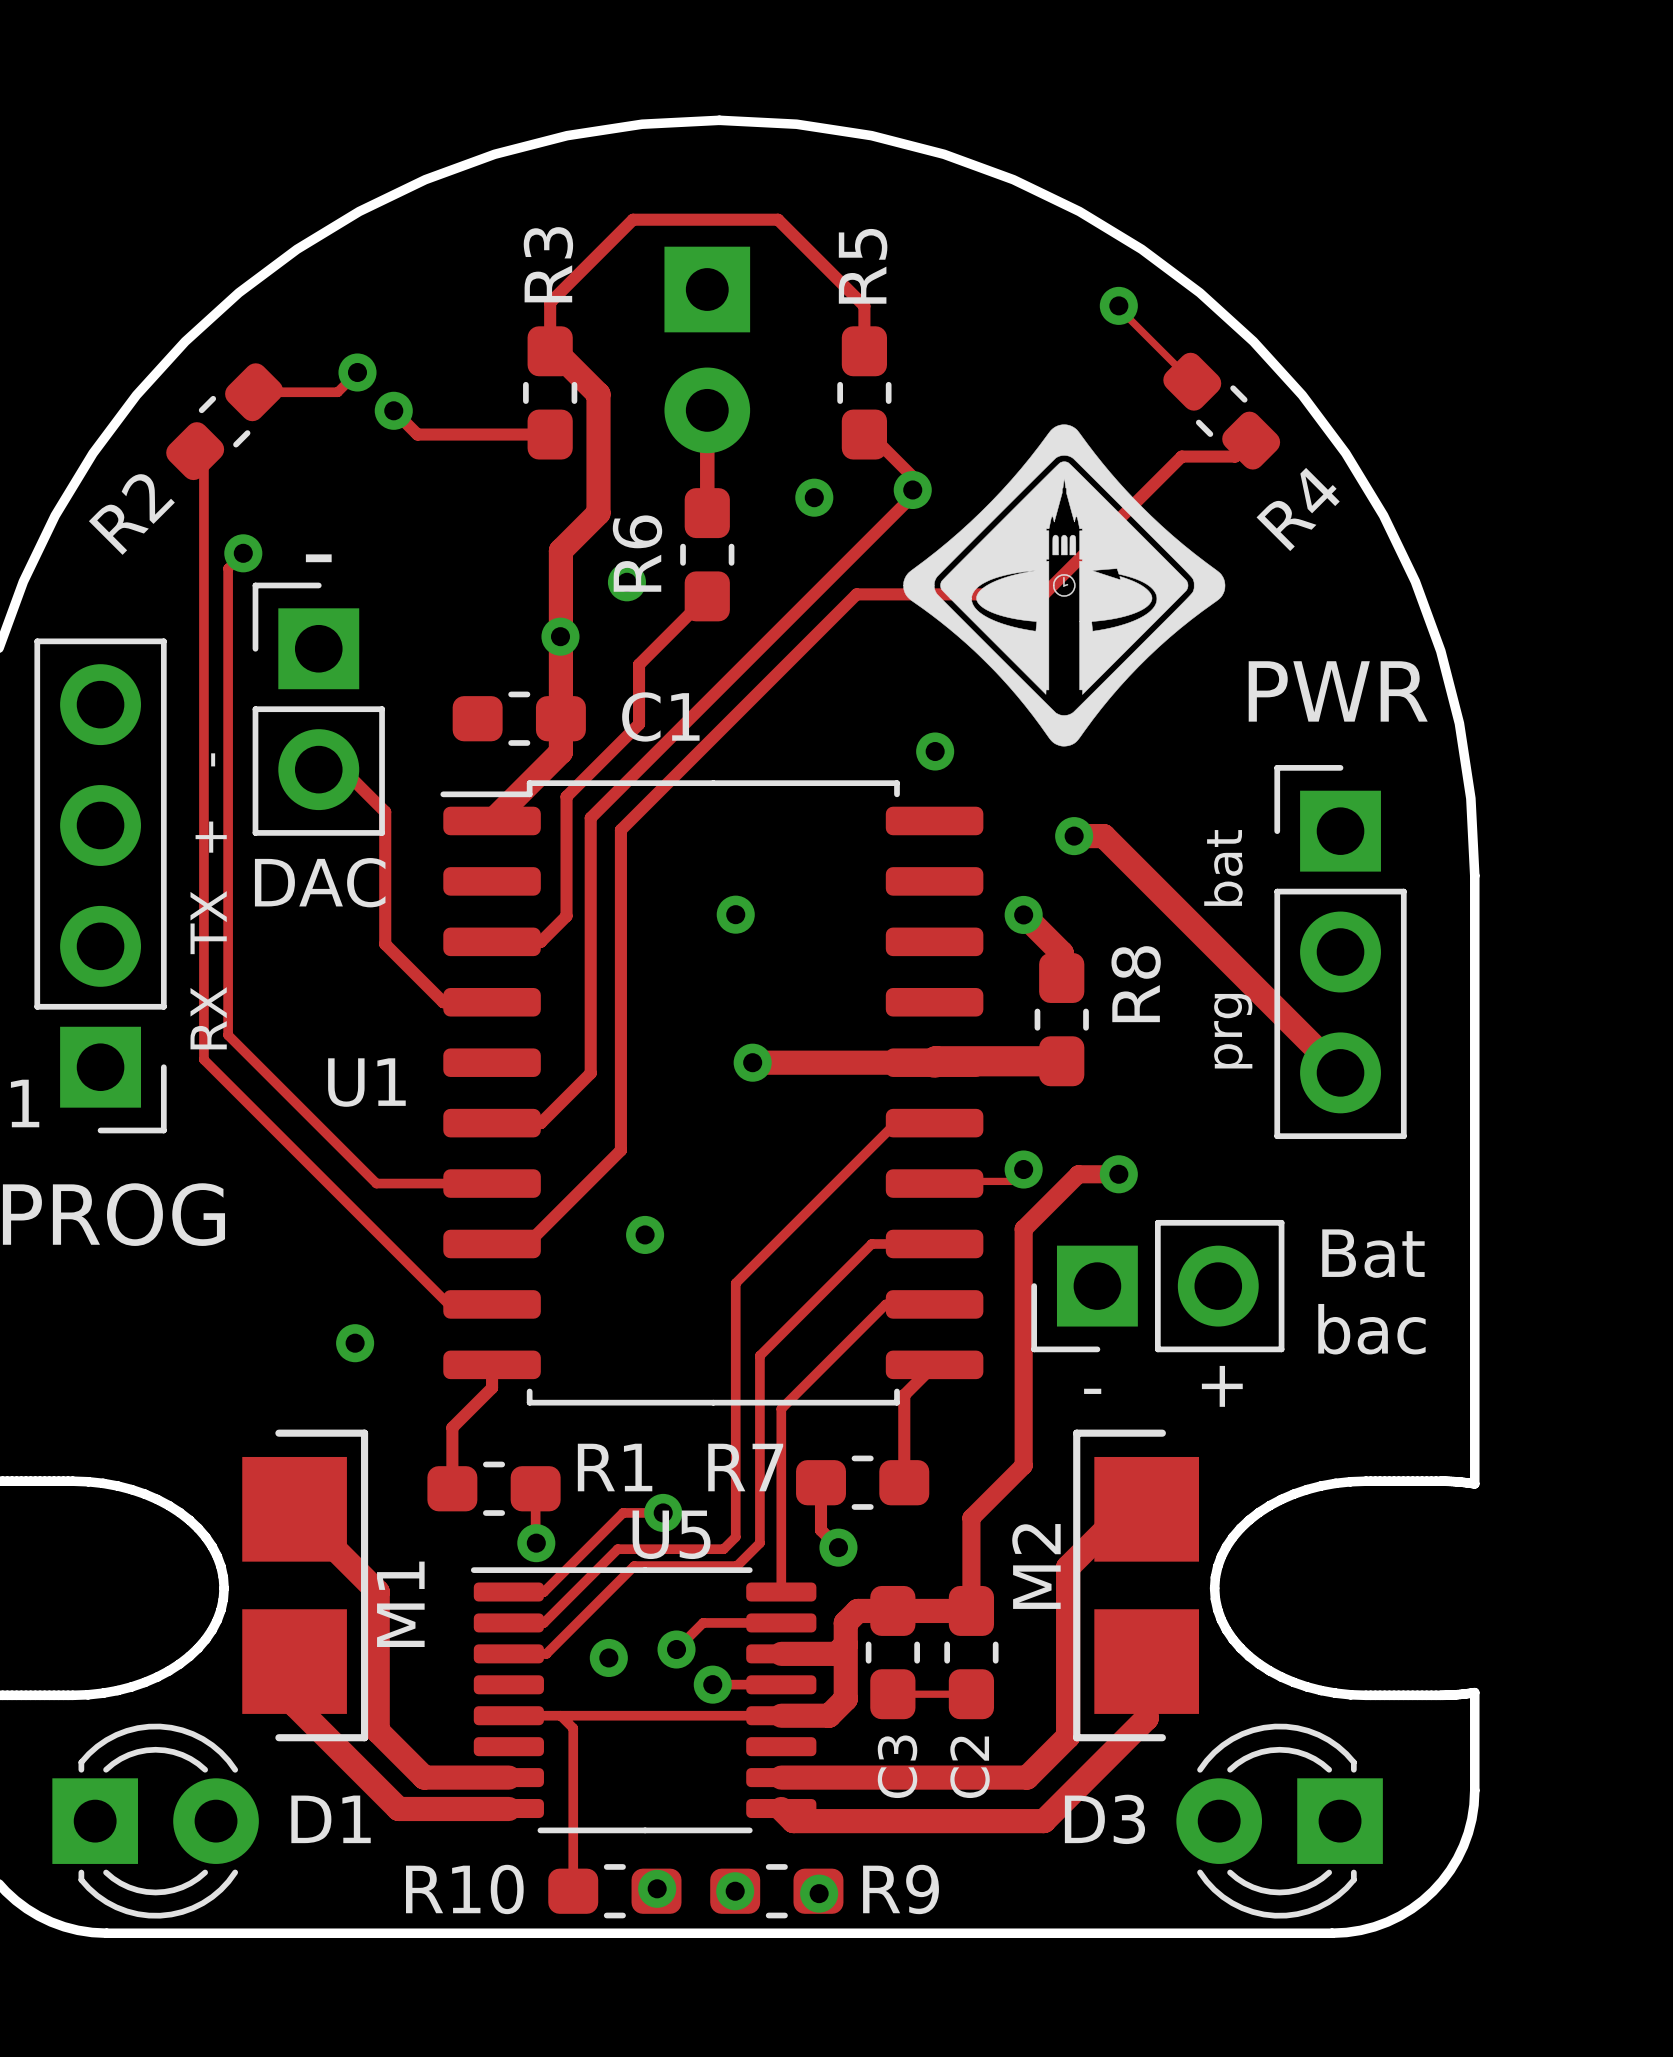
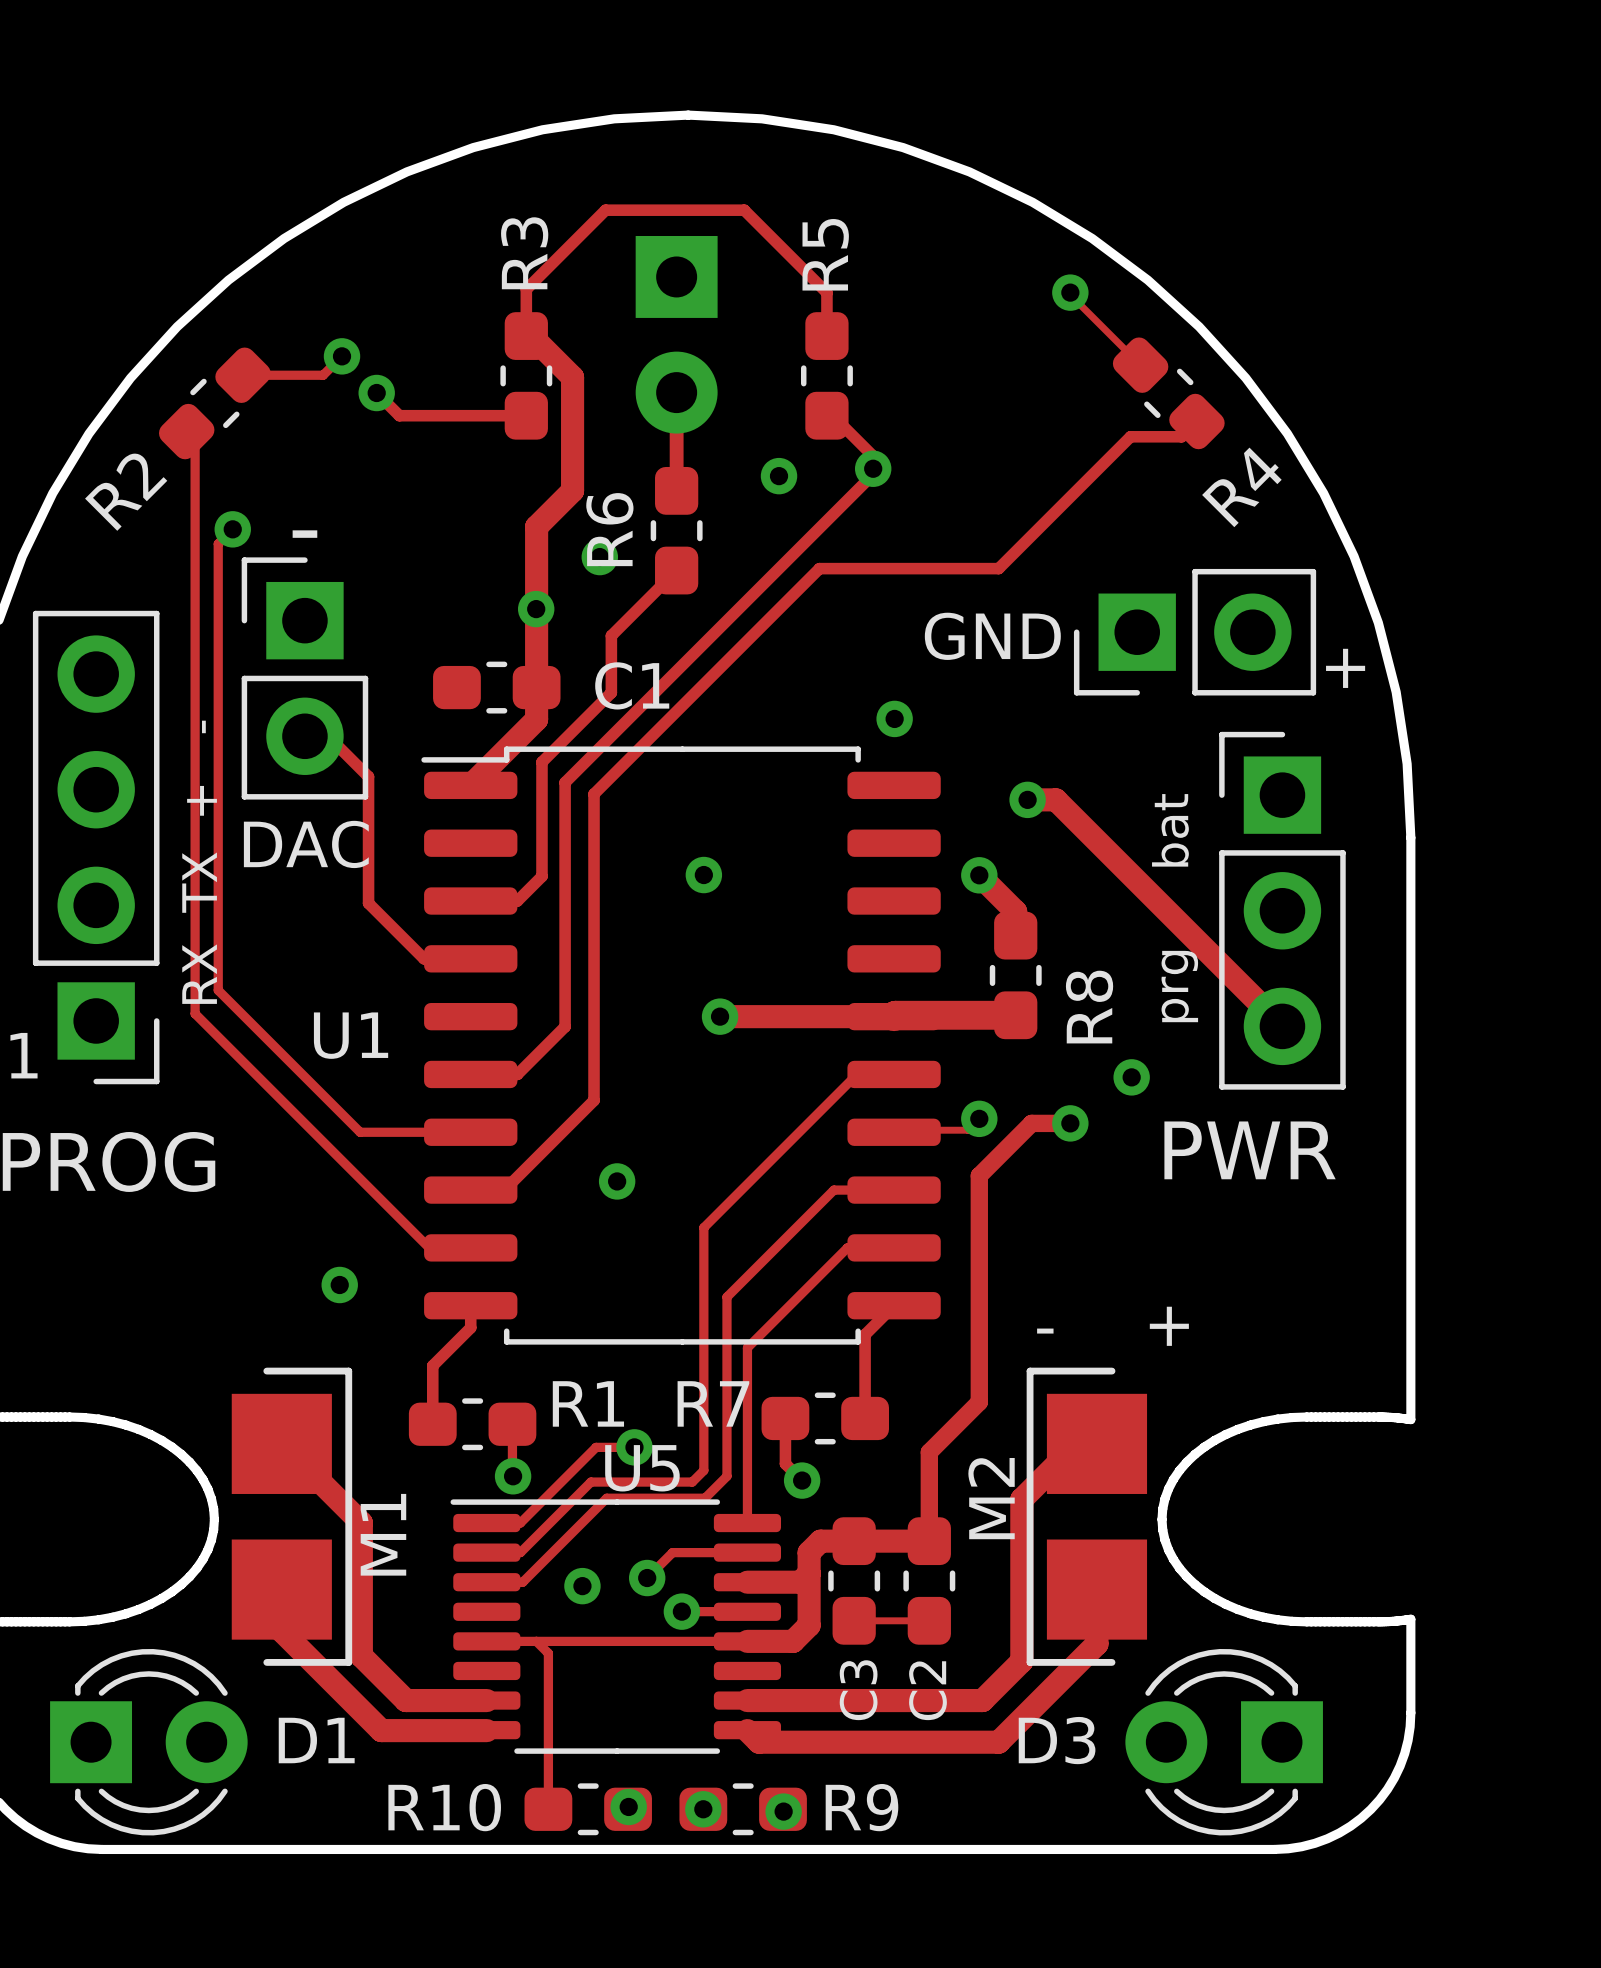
drawing: [903, 424, 1226, 747] -> none
text: none -> GND (992, 636)
text position: PWR (1338, 691) -> PWR (1250, 1150)
text: none -> + (1345, 668)
R8 name position: R8 (1136, 984) -> R8 (1089, 1007)
via: none -> (1131, 1077)
text: Bat (1373, 1253) -> none
part position: (1157, 1286) -> (1195, 632)
text: bac (1371, 1329) -> none

